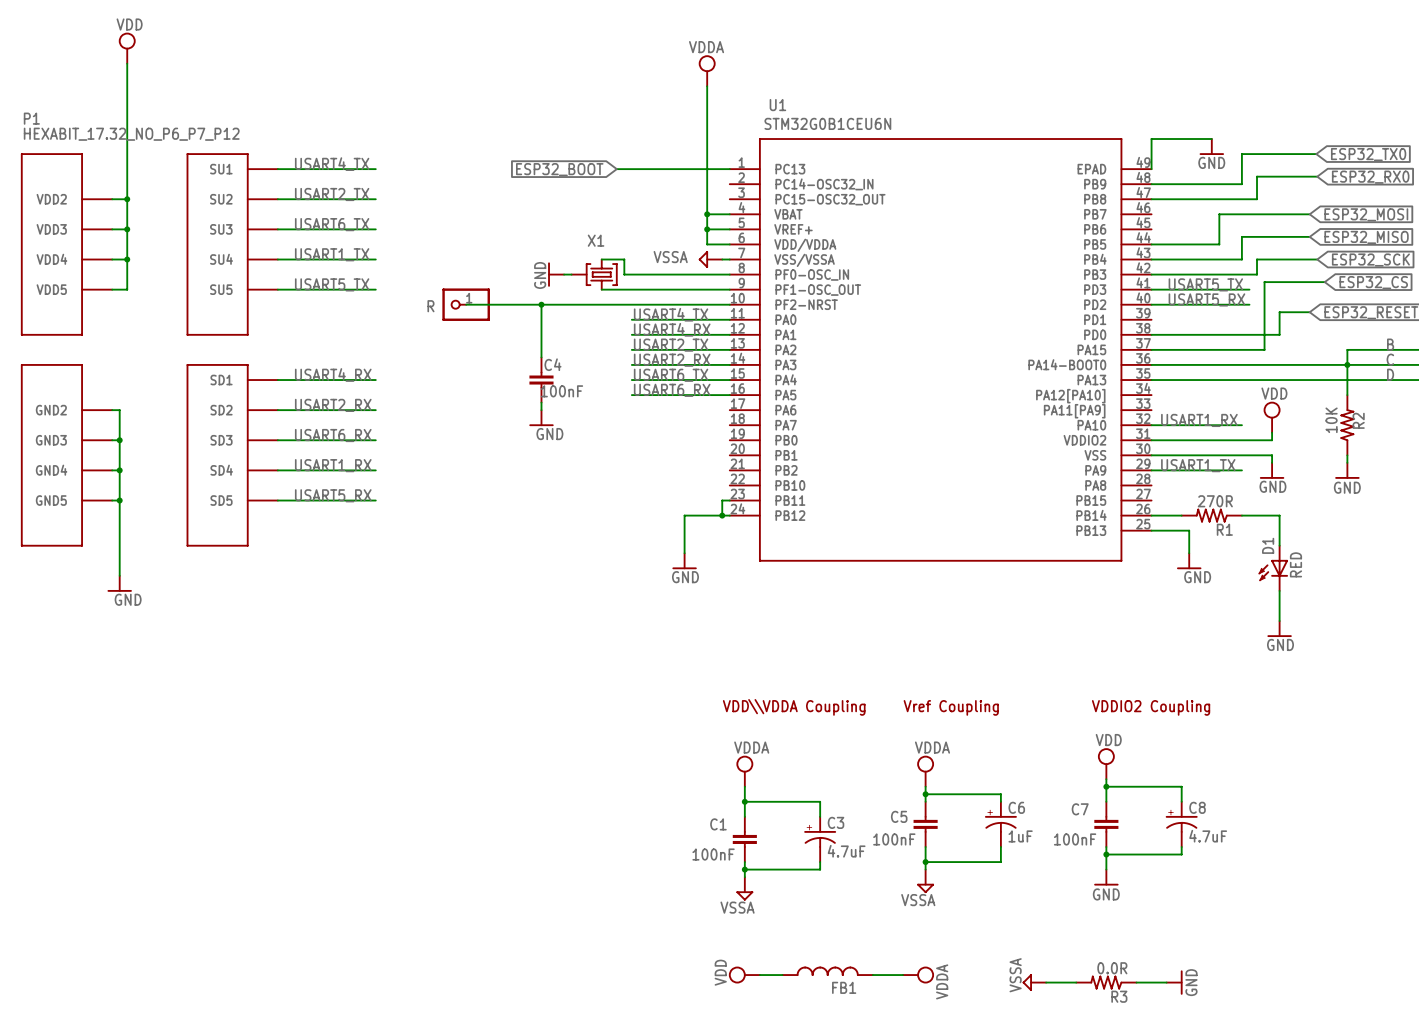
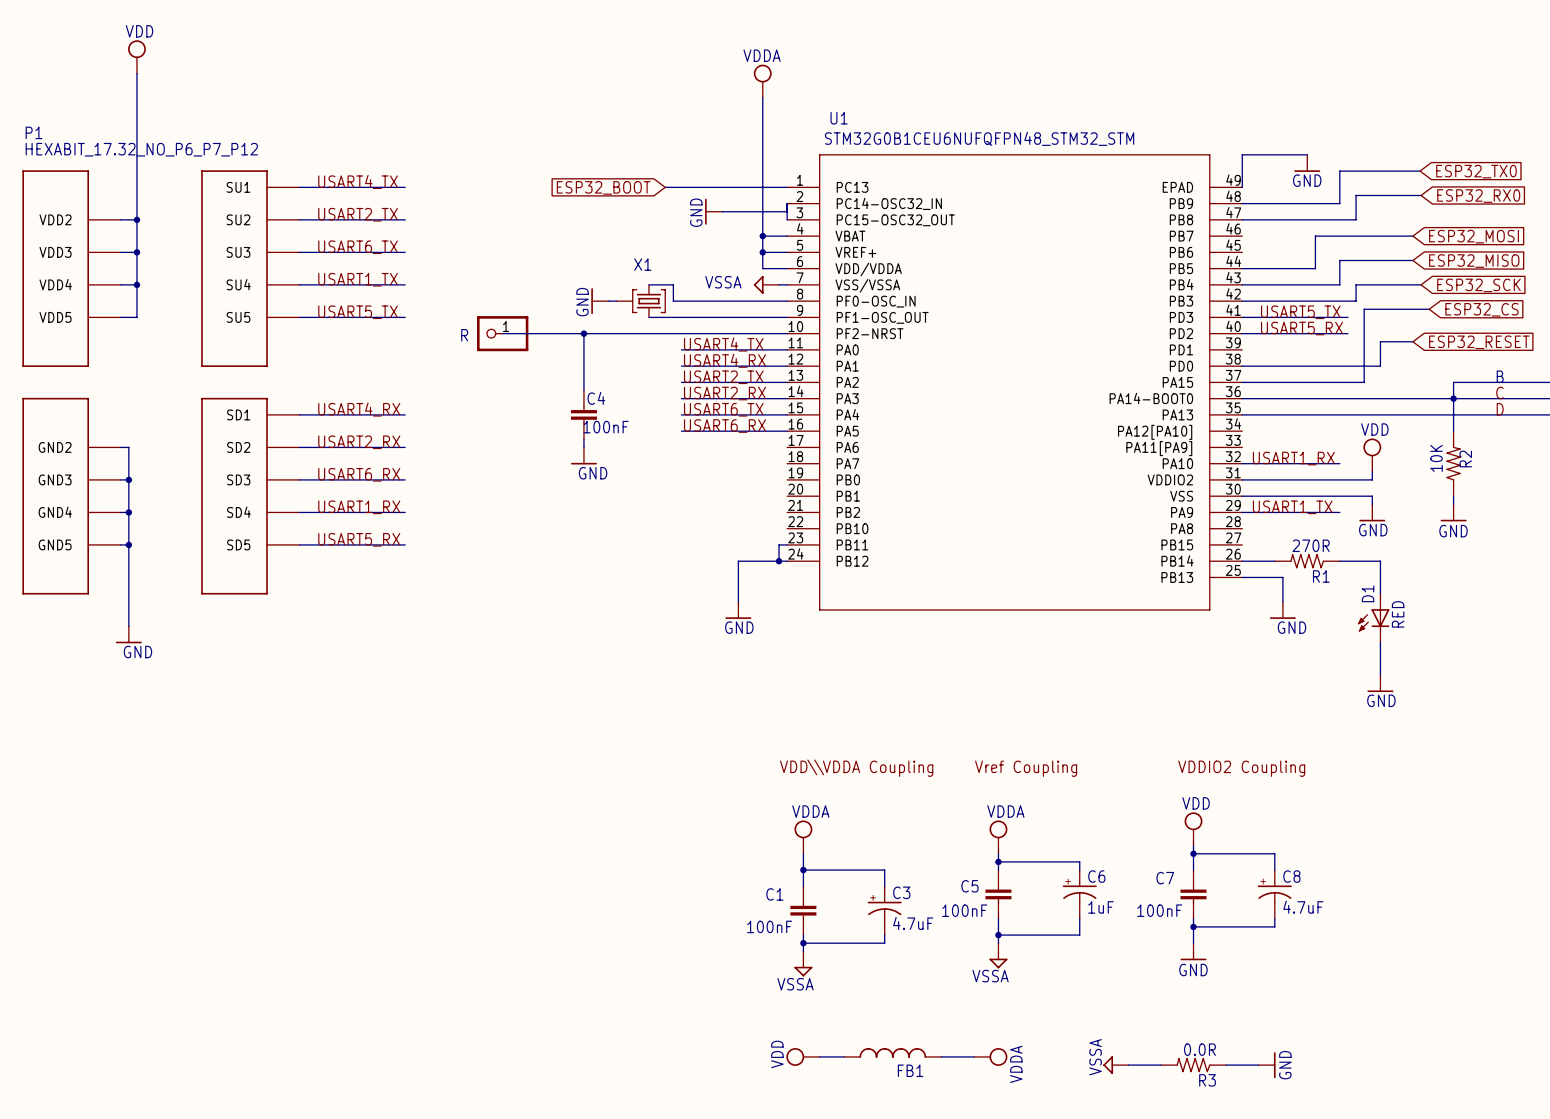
U1 value: STM32G0B1CEU6N (827, 123) -> STM32G0B1CEU6NUFQFPN48_STM32_STM (979, 138)
wire: none -> (787, 203) (787, 219)
power symbol: none -> GND (713, 211)
wire: none -> (722, 211) (787, 211)

